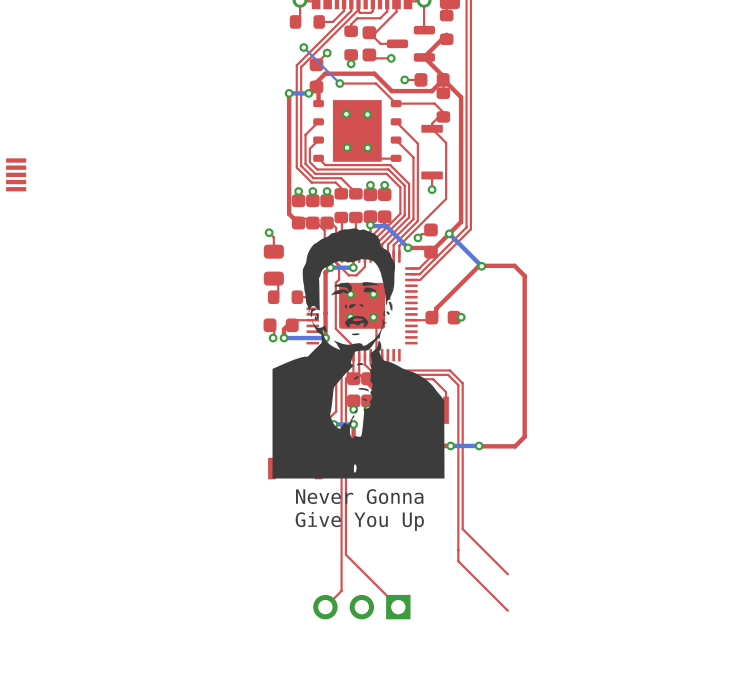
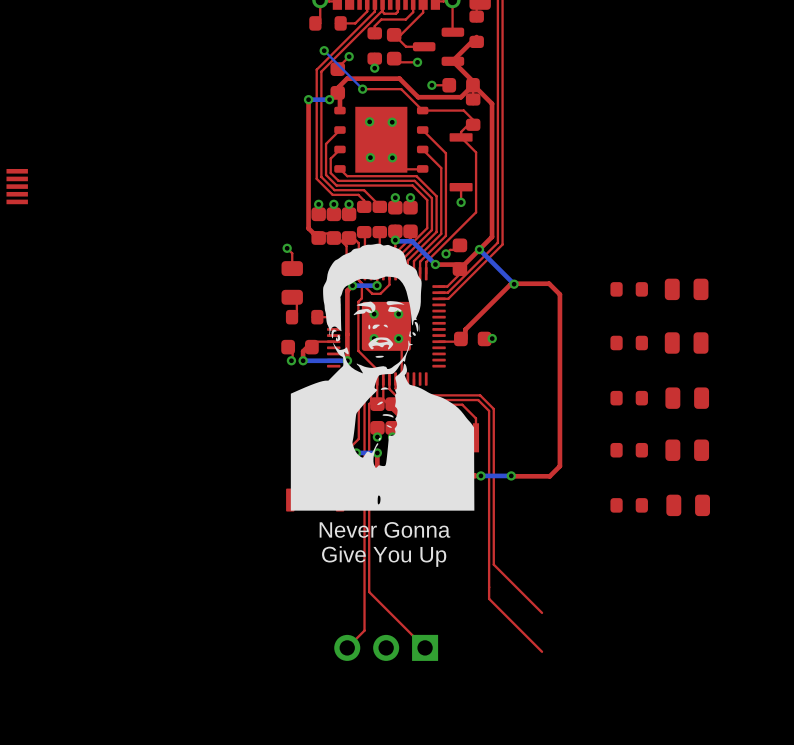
part: none -> (629, 289)
part: none -> (686, 289)
part: none -> (629, 343)
part: none -> (686, 343)
part: none -> (629, 398)
part: none -> (687, 398)
part: none -> (629, 450)
part: none -> (687, 450)
part: none -> (629, 505)
part: none -> (688, 505)

